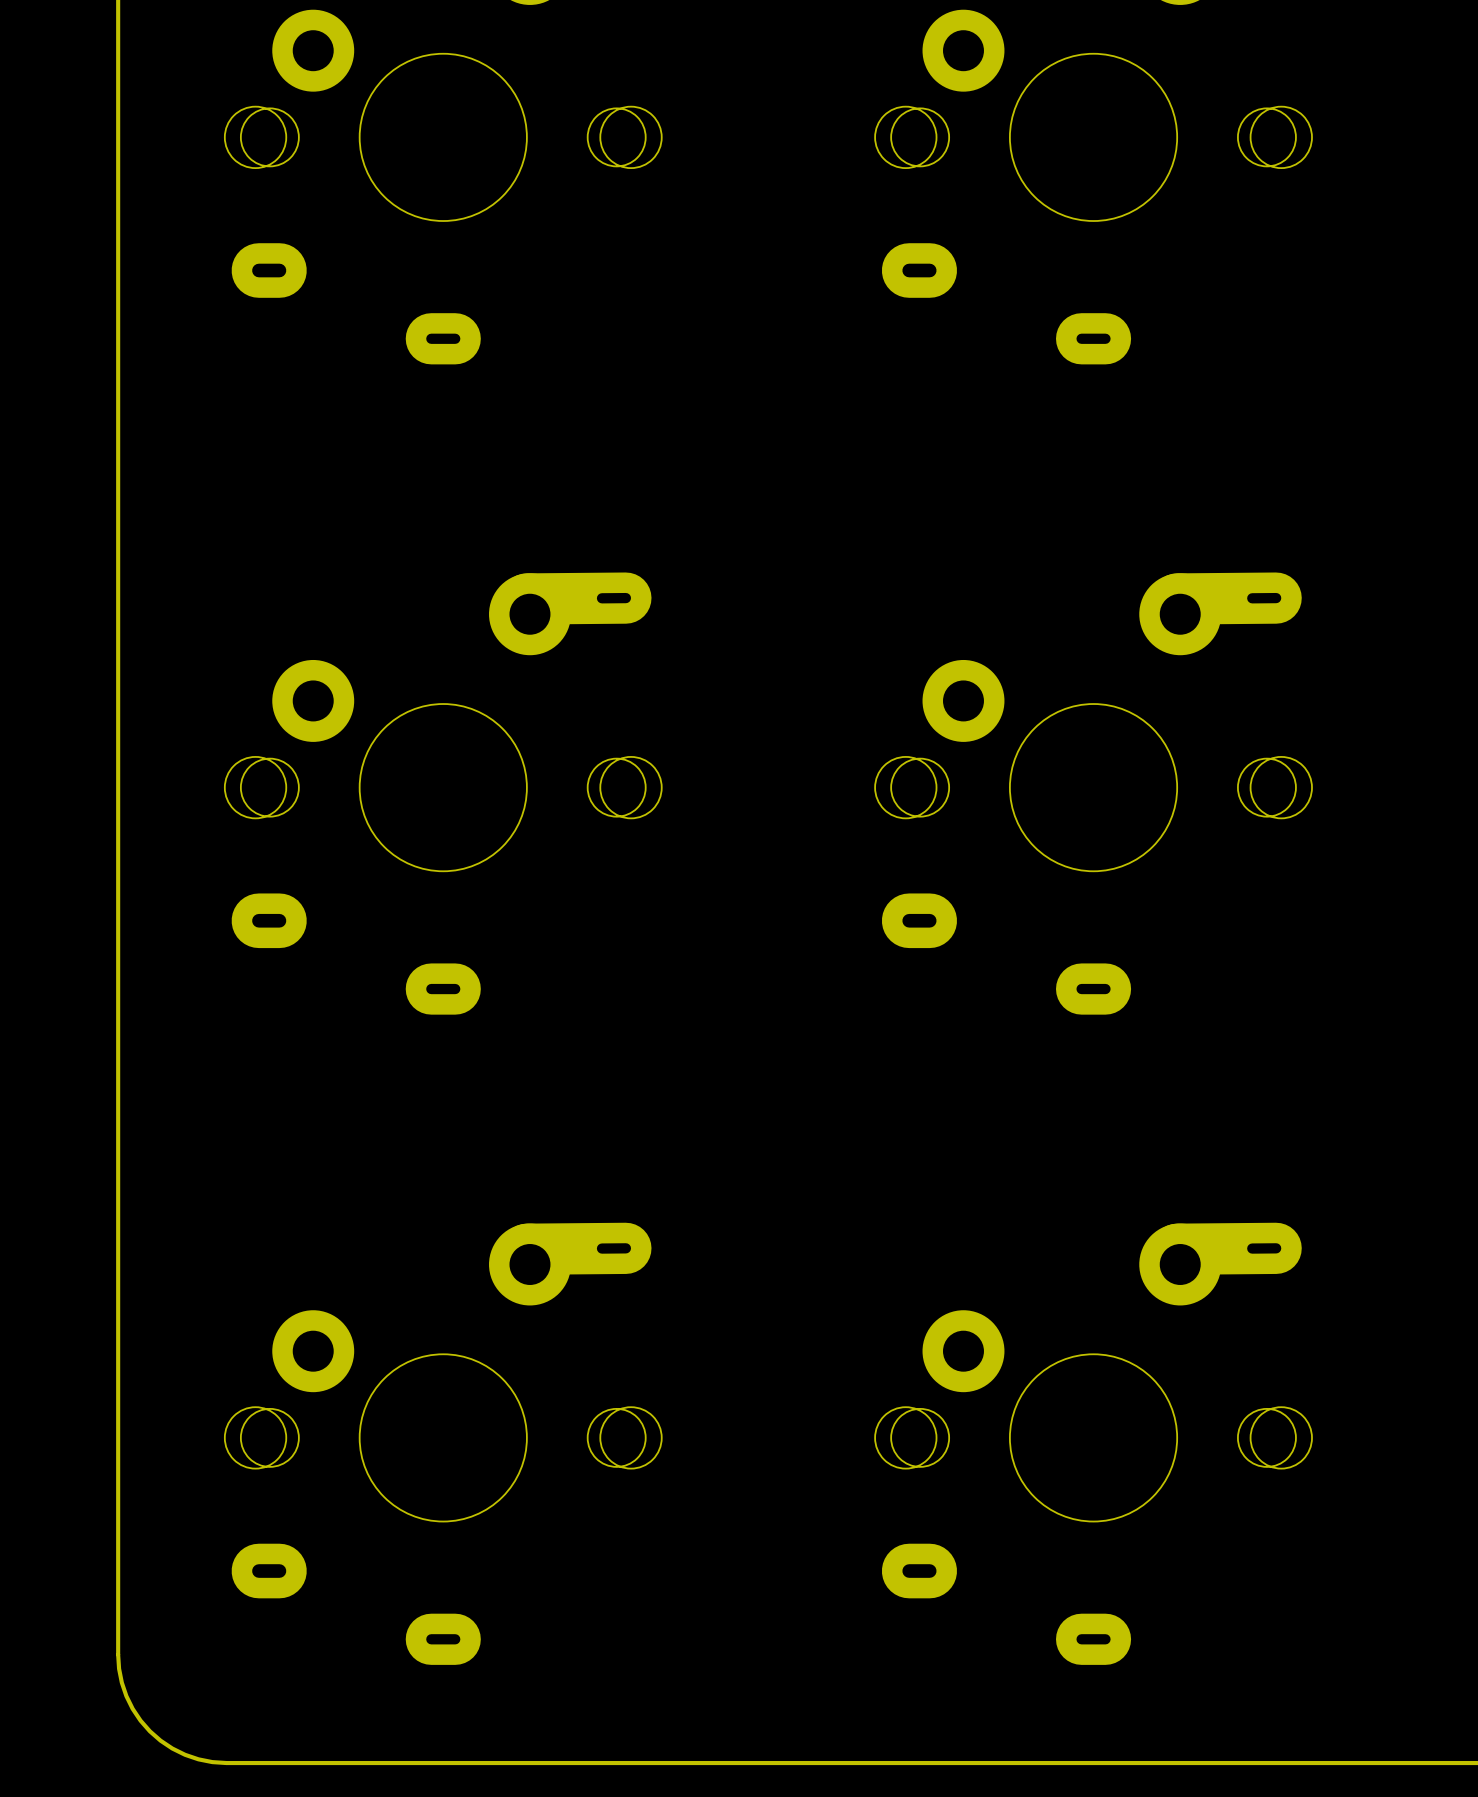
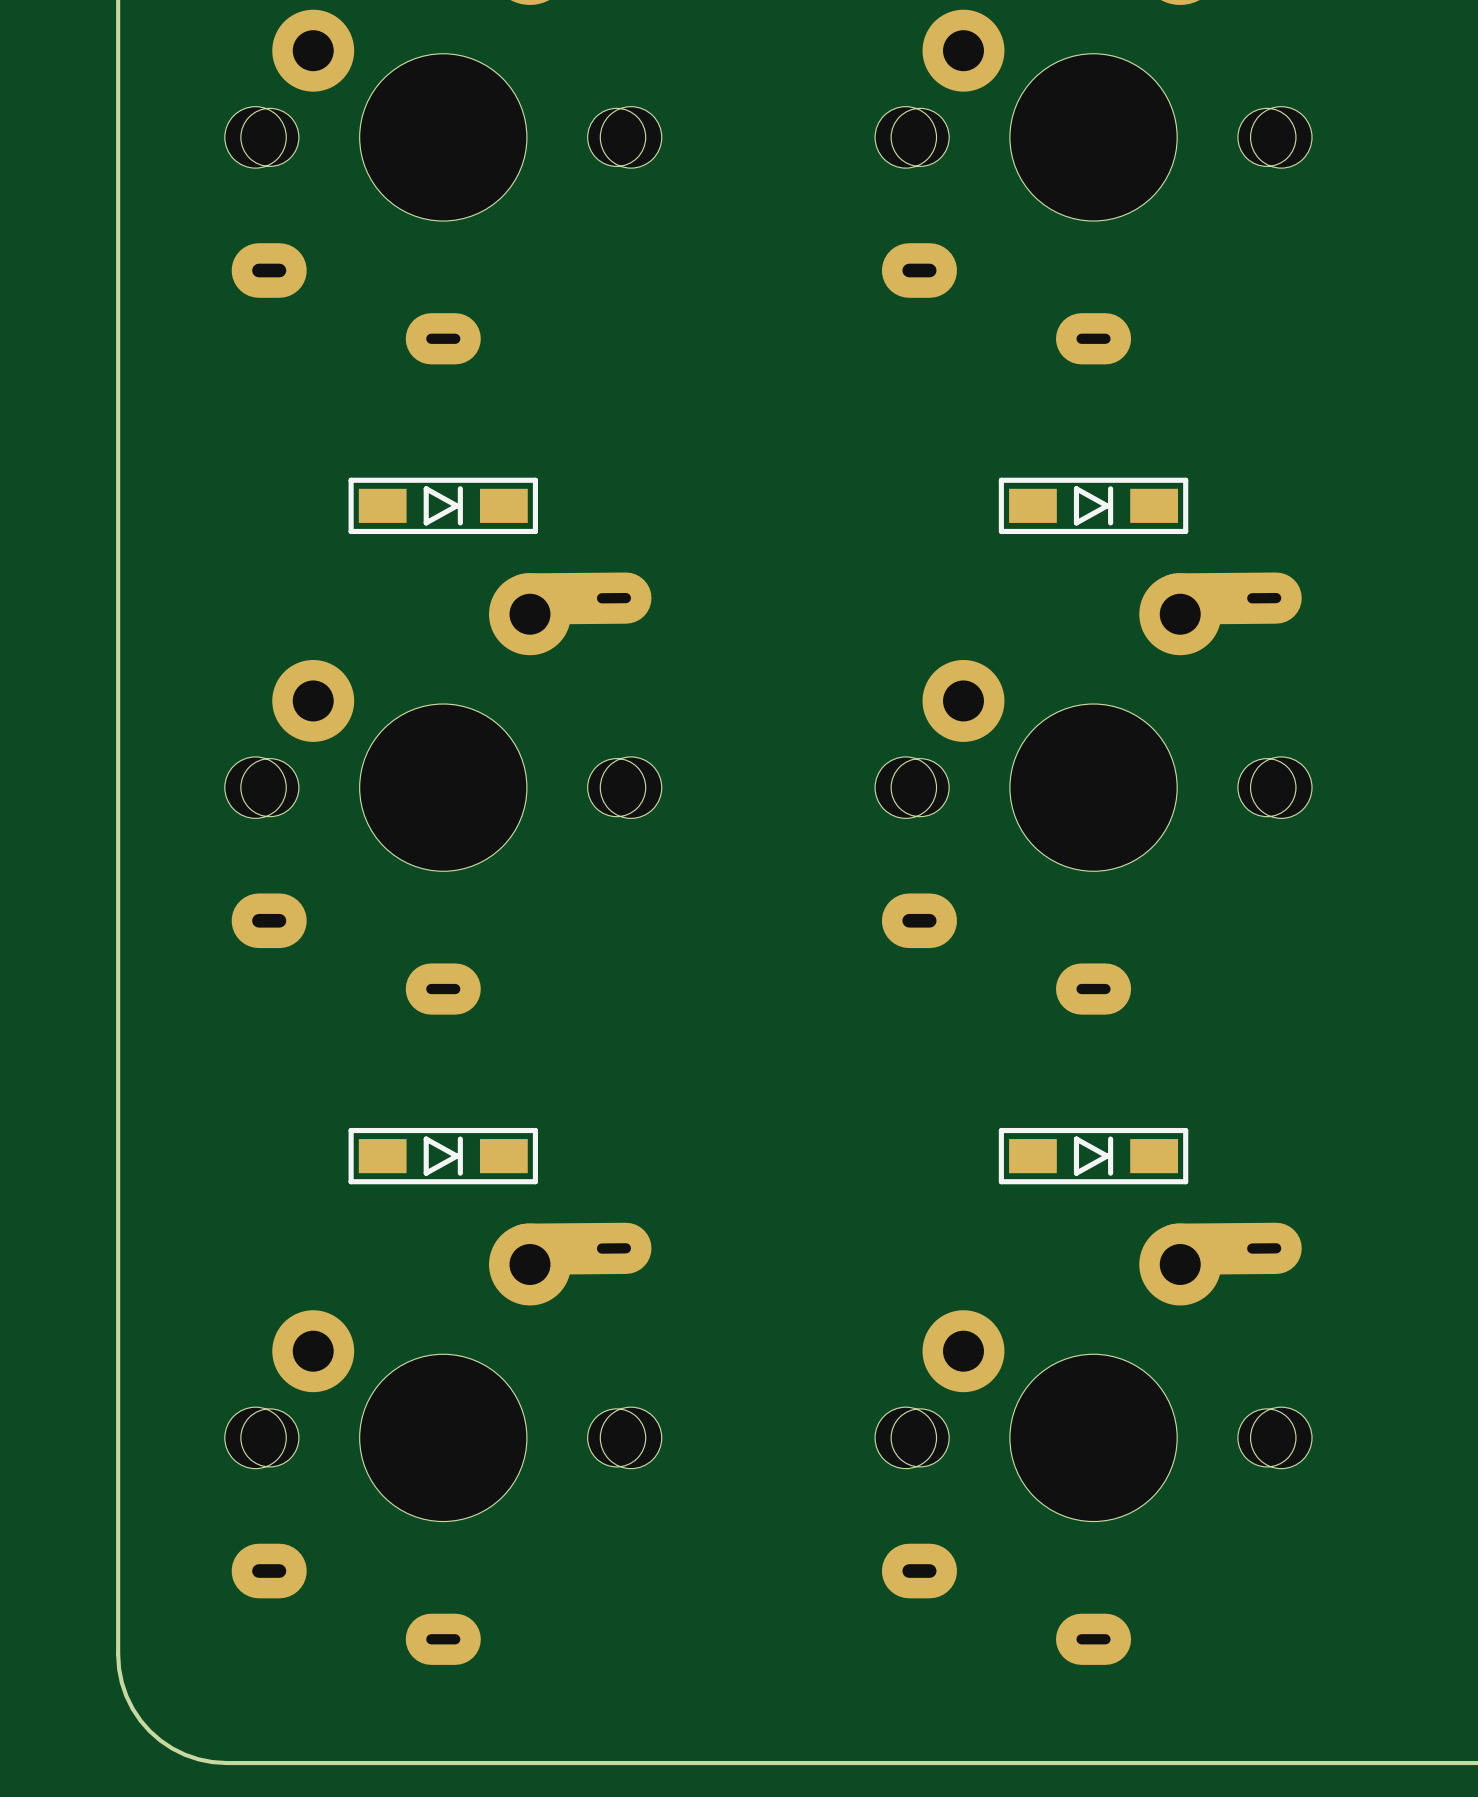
part: none -> (443, 505)
part: none -> (1093, 505)
part: none -> (443, 1156)
part: none -> (1093, 1156)

